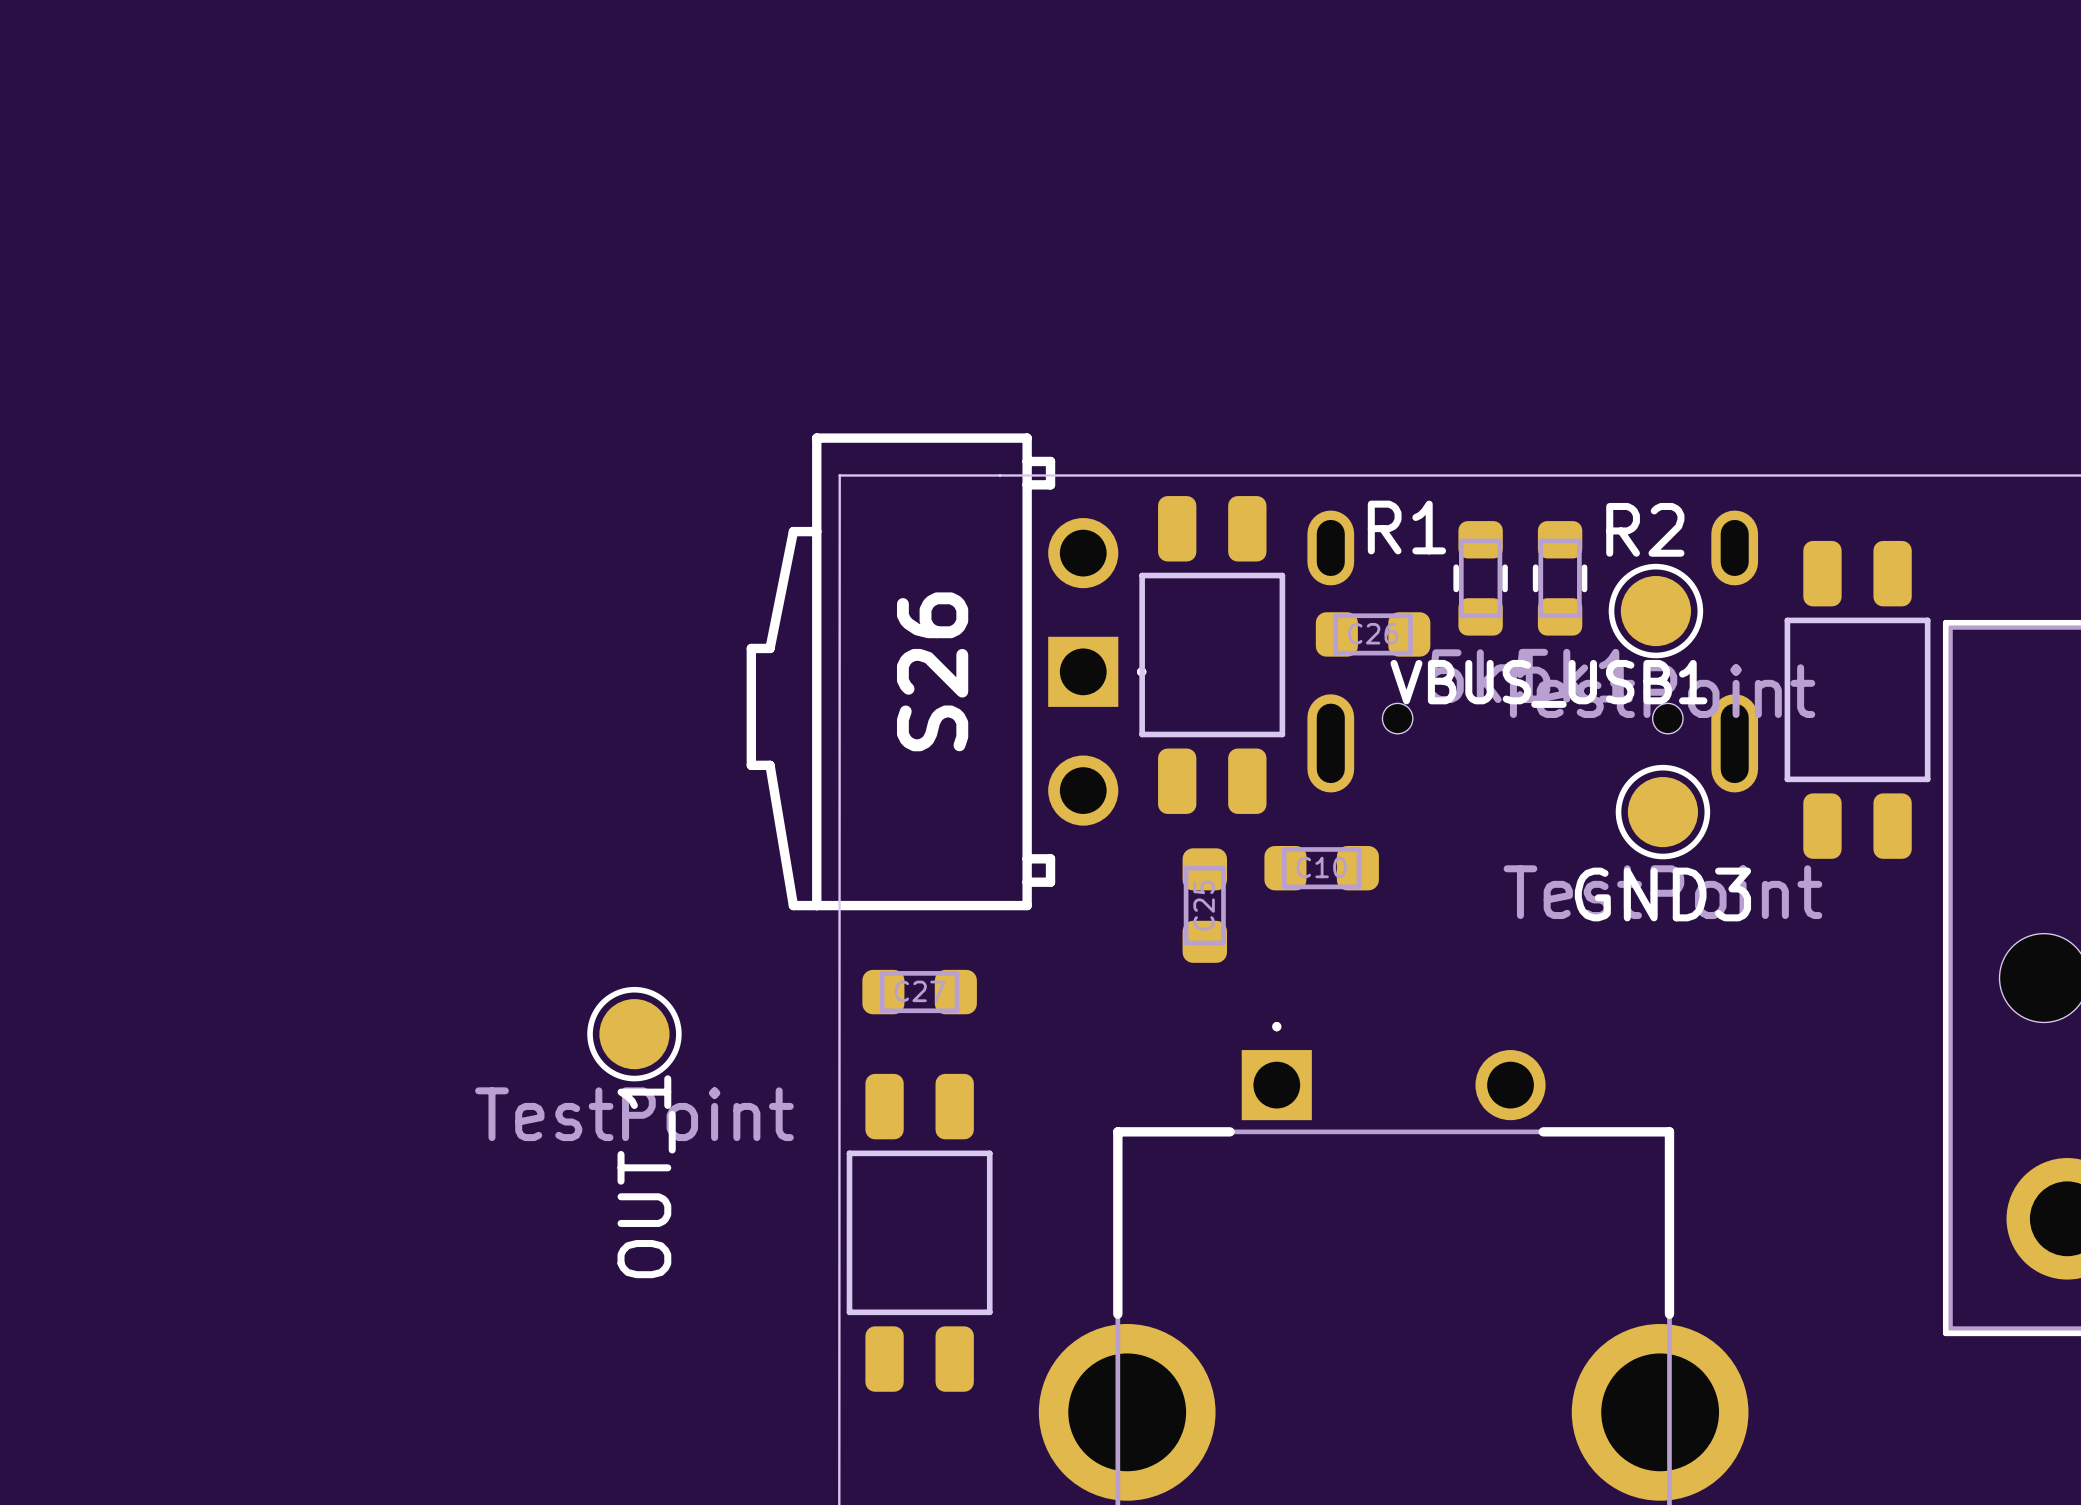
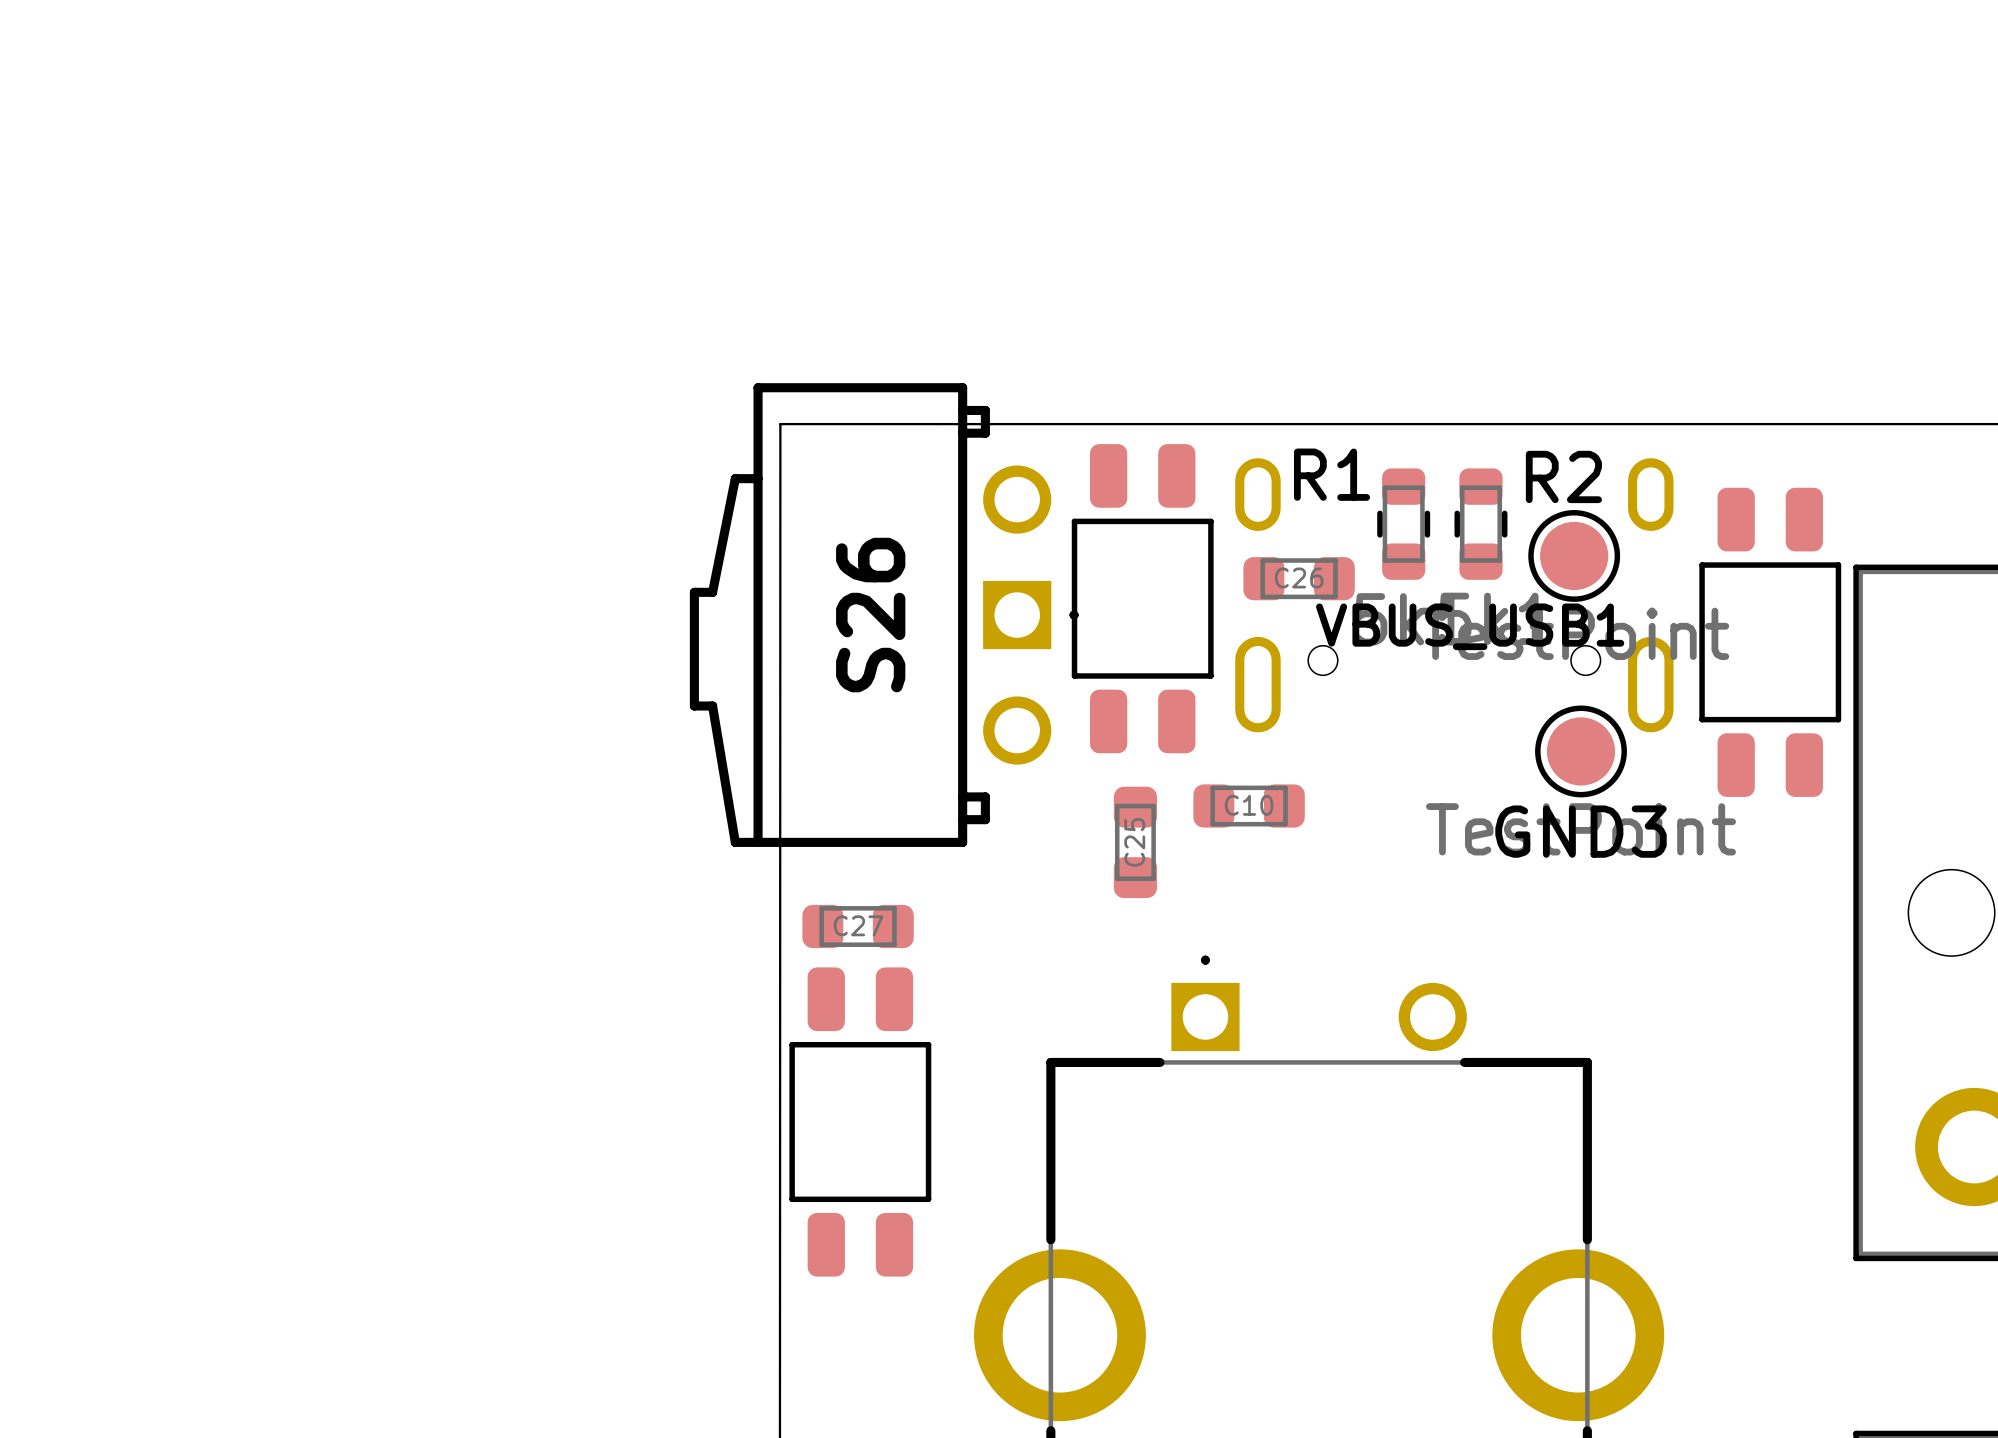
OUT_1: TestPoint (634, 1034) -> none
part position: (919, 1232) -> (860, 1122)

